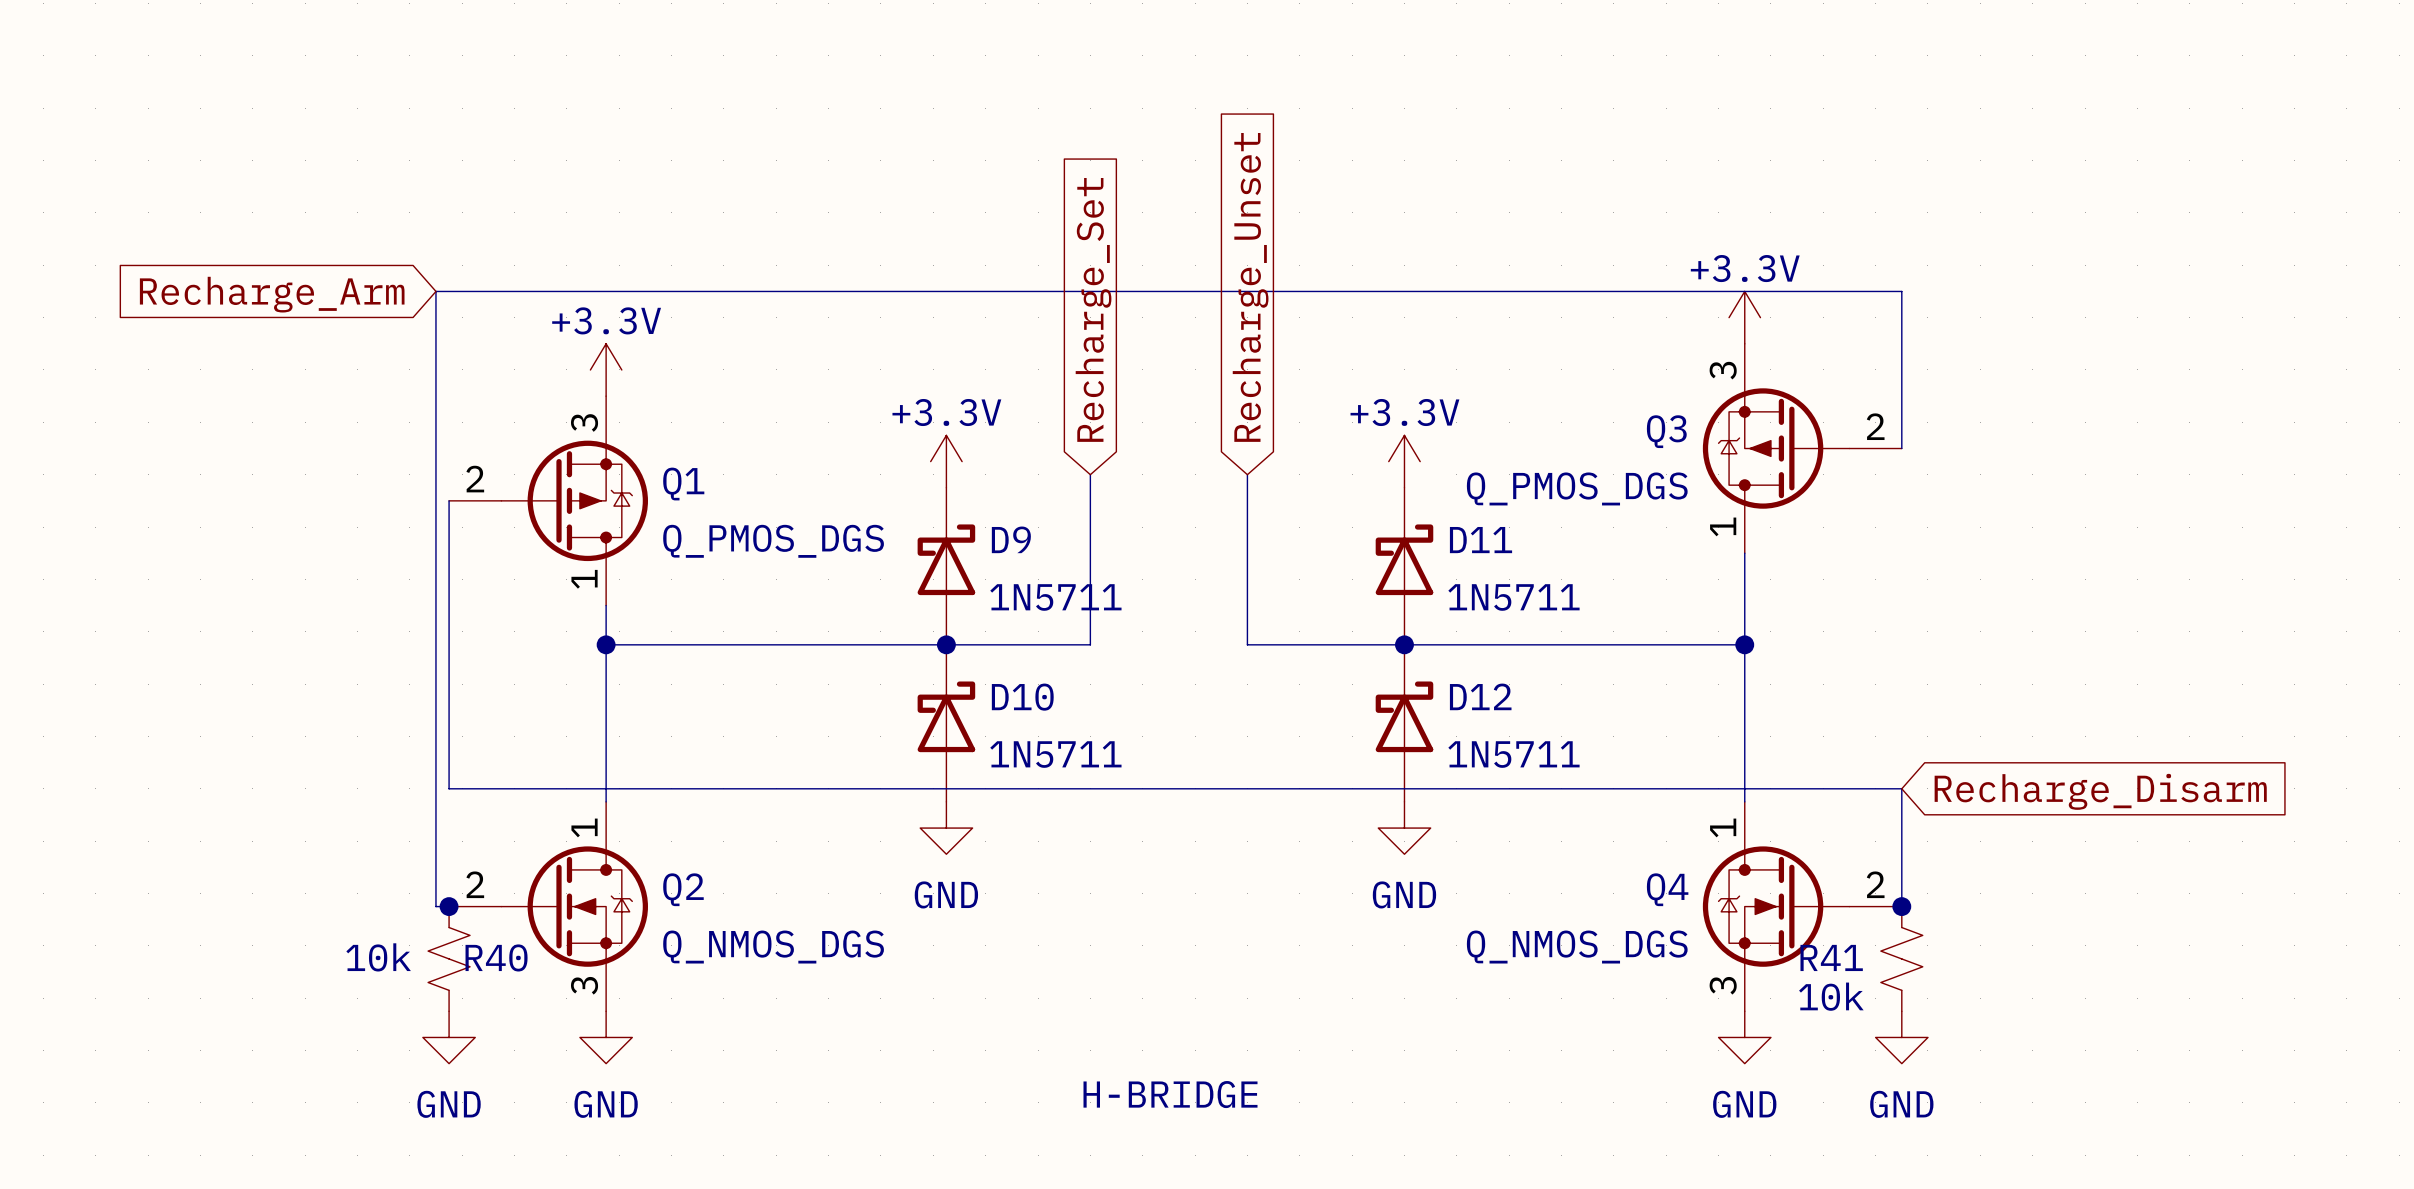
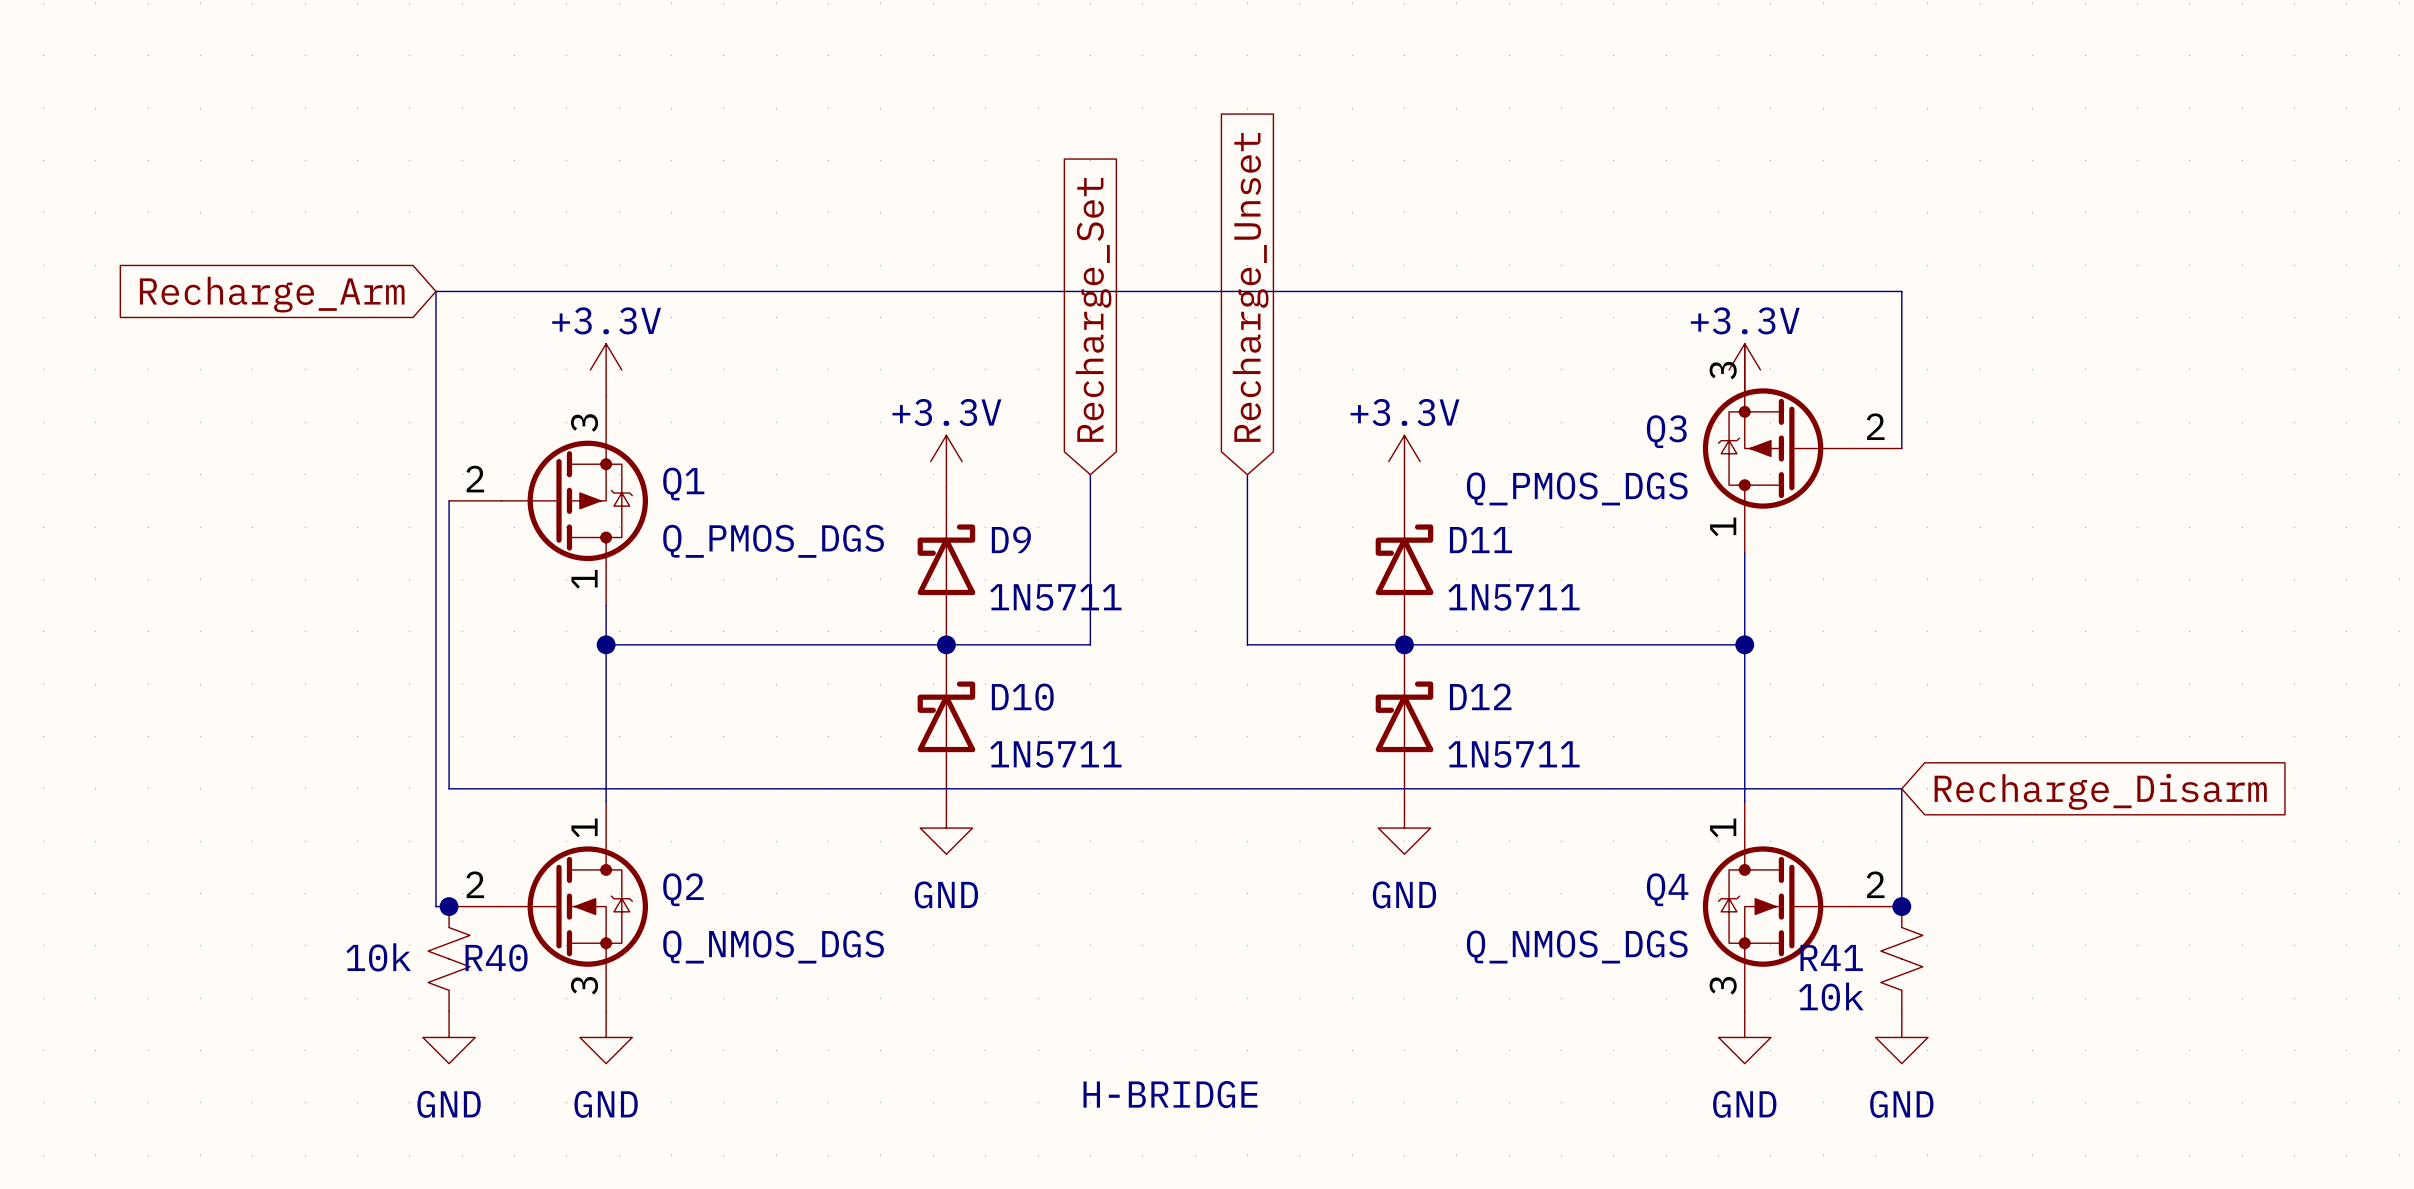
power symbol position: +3.3V (1744, 317) -> +3.3V (1744, 369)

